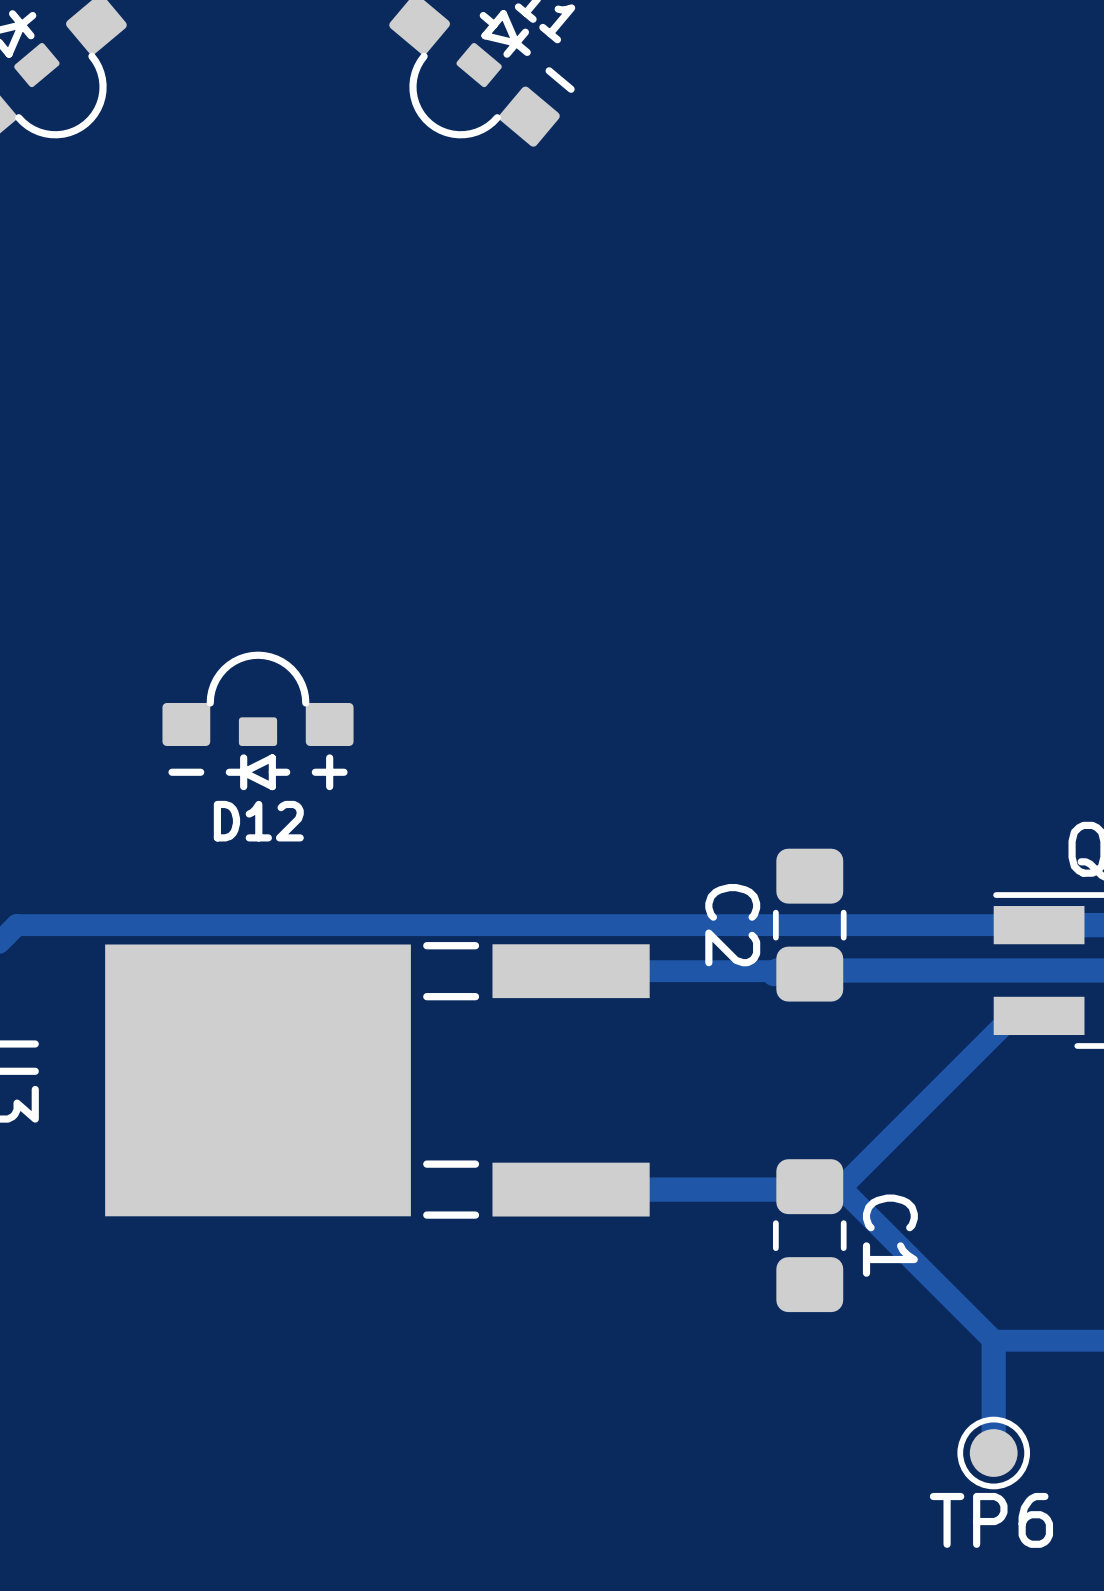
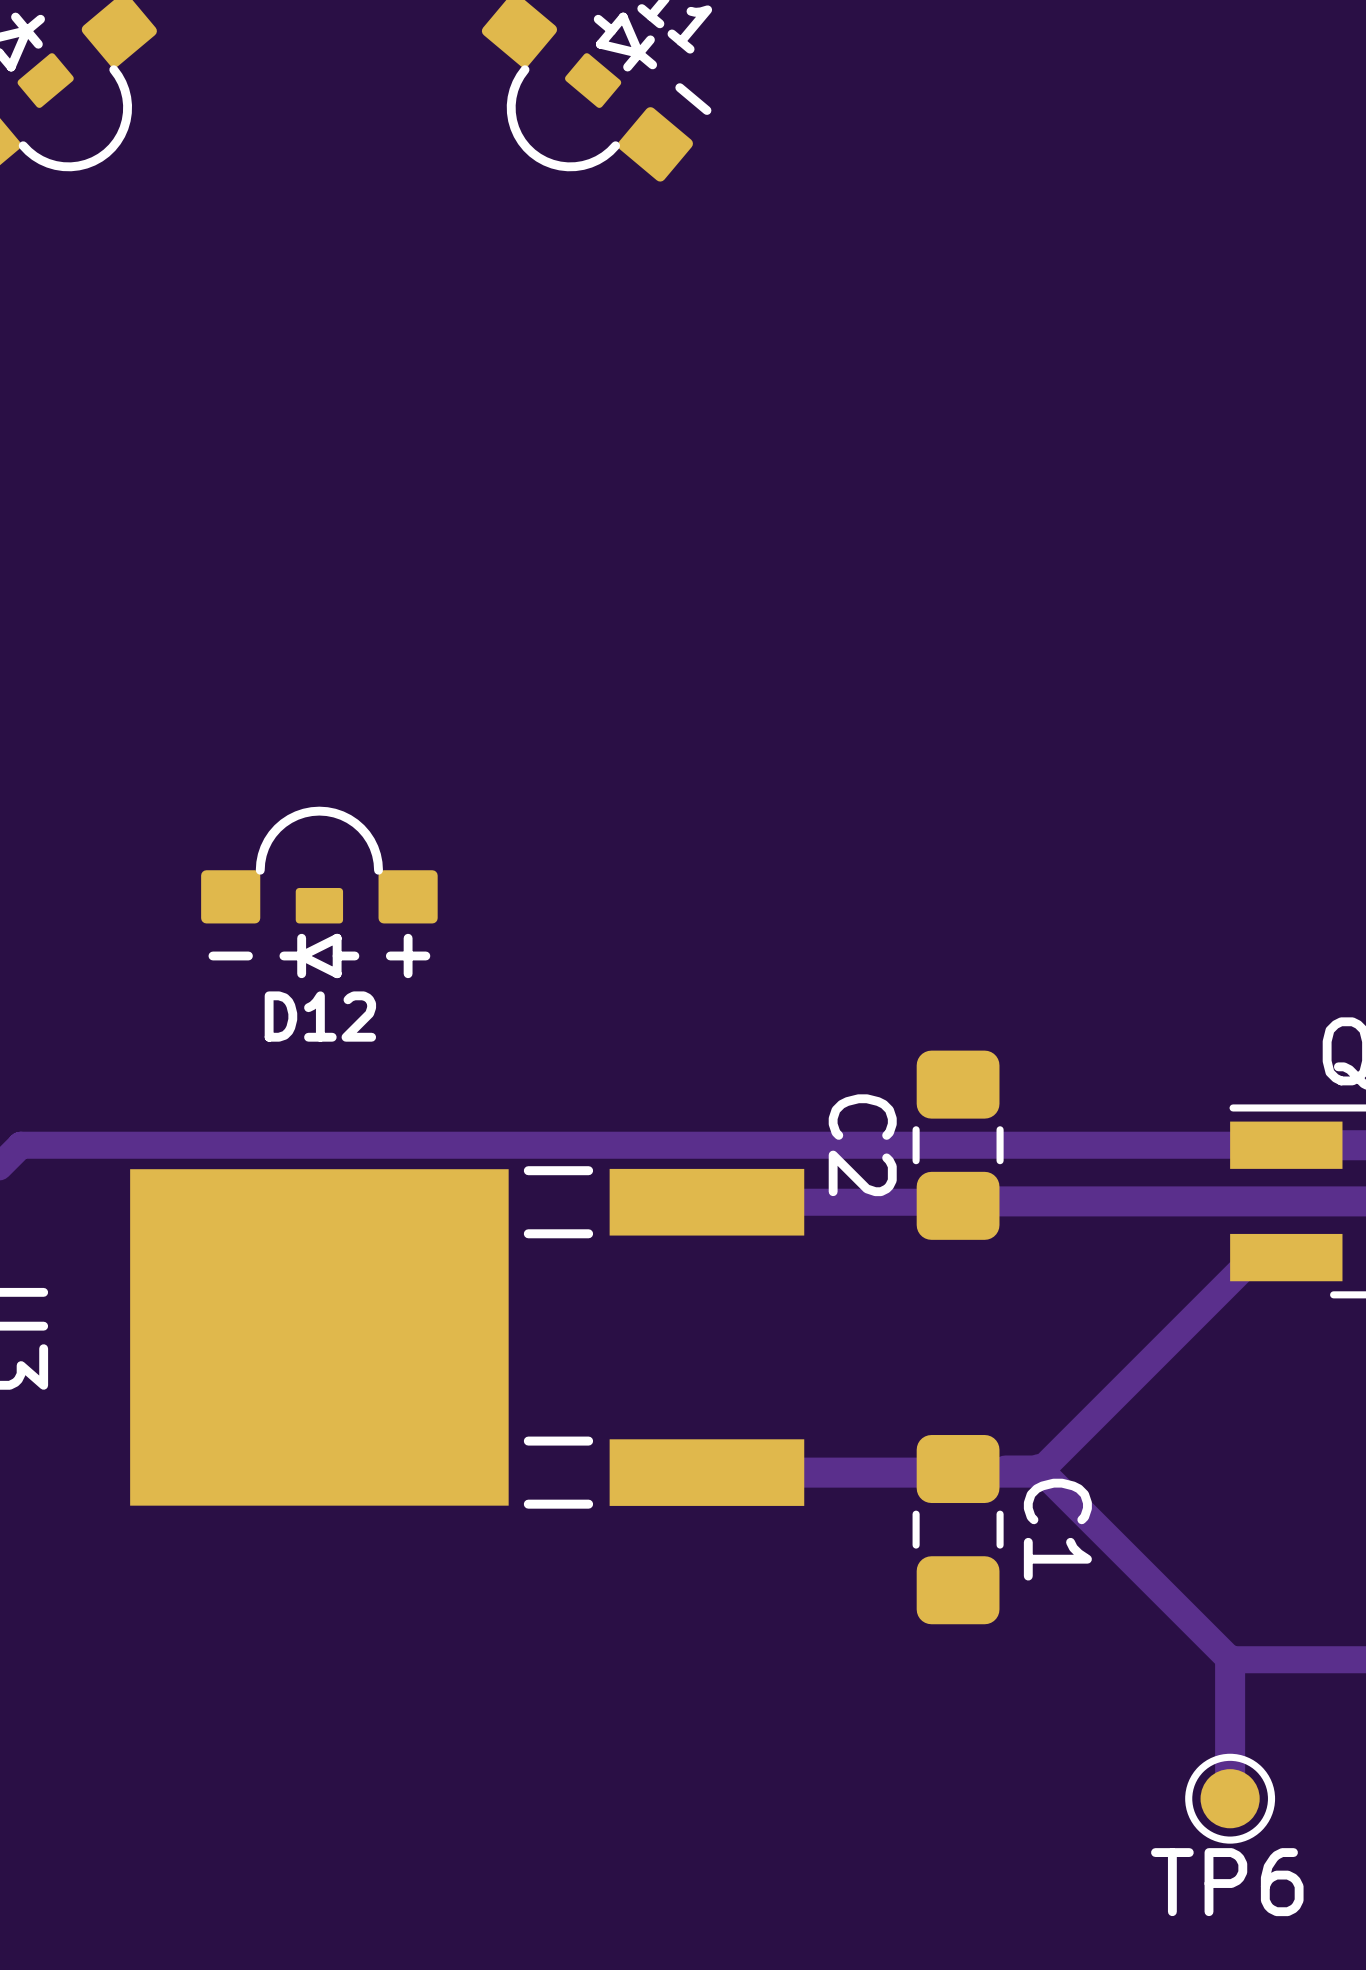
C2 position: (809, 925) -> (958, 1145)
C1 position: (809, 1235) -> (958, 1529)

